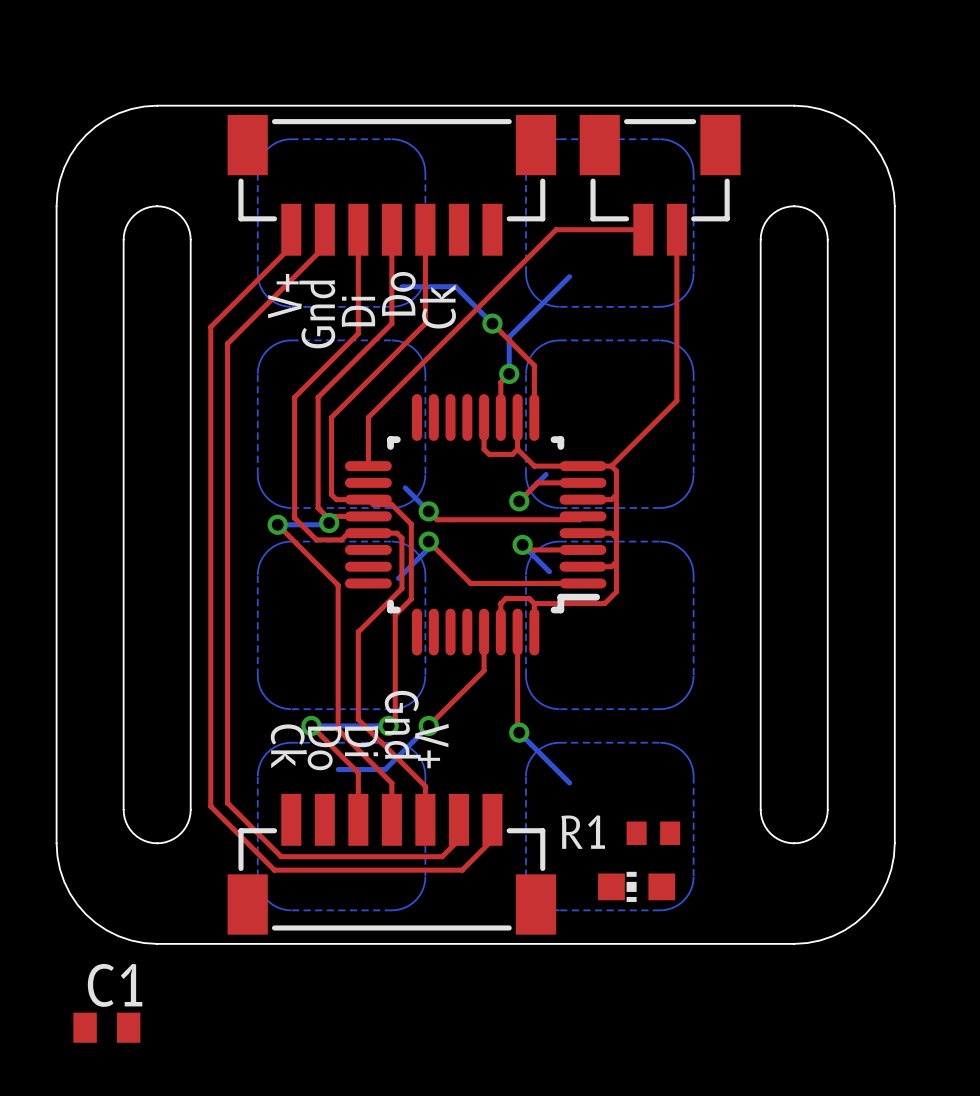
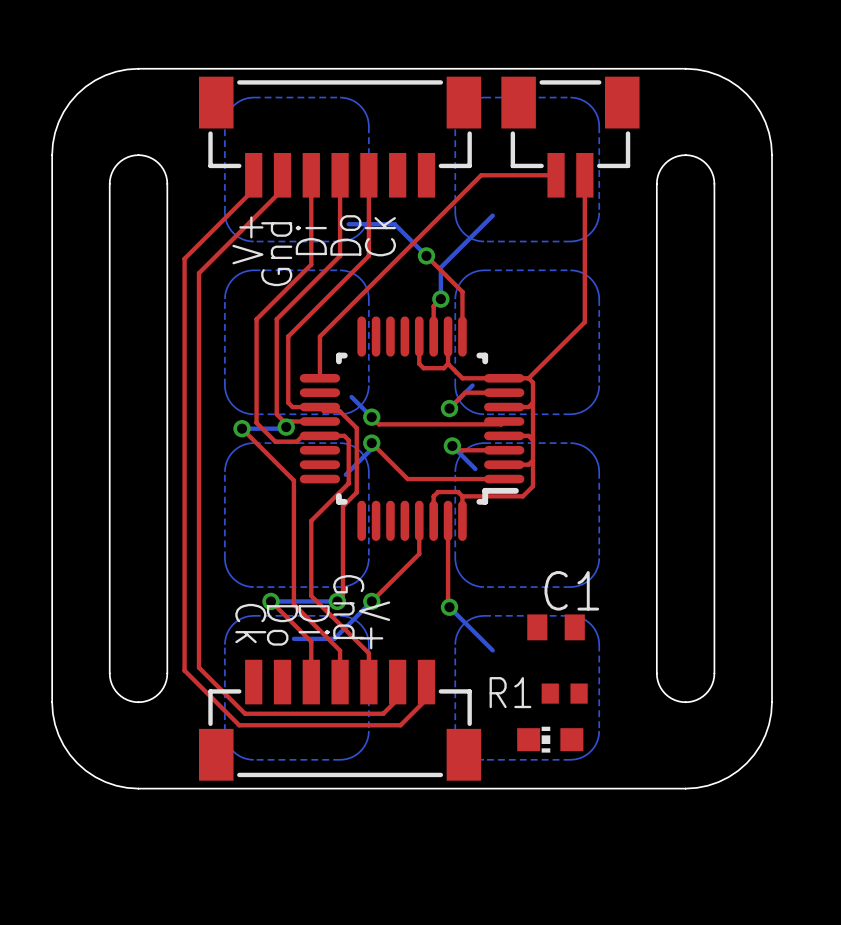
C1 position: (106, 1027) -> (556, 627)

